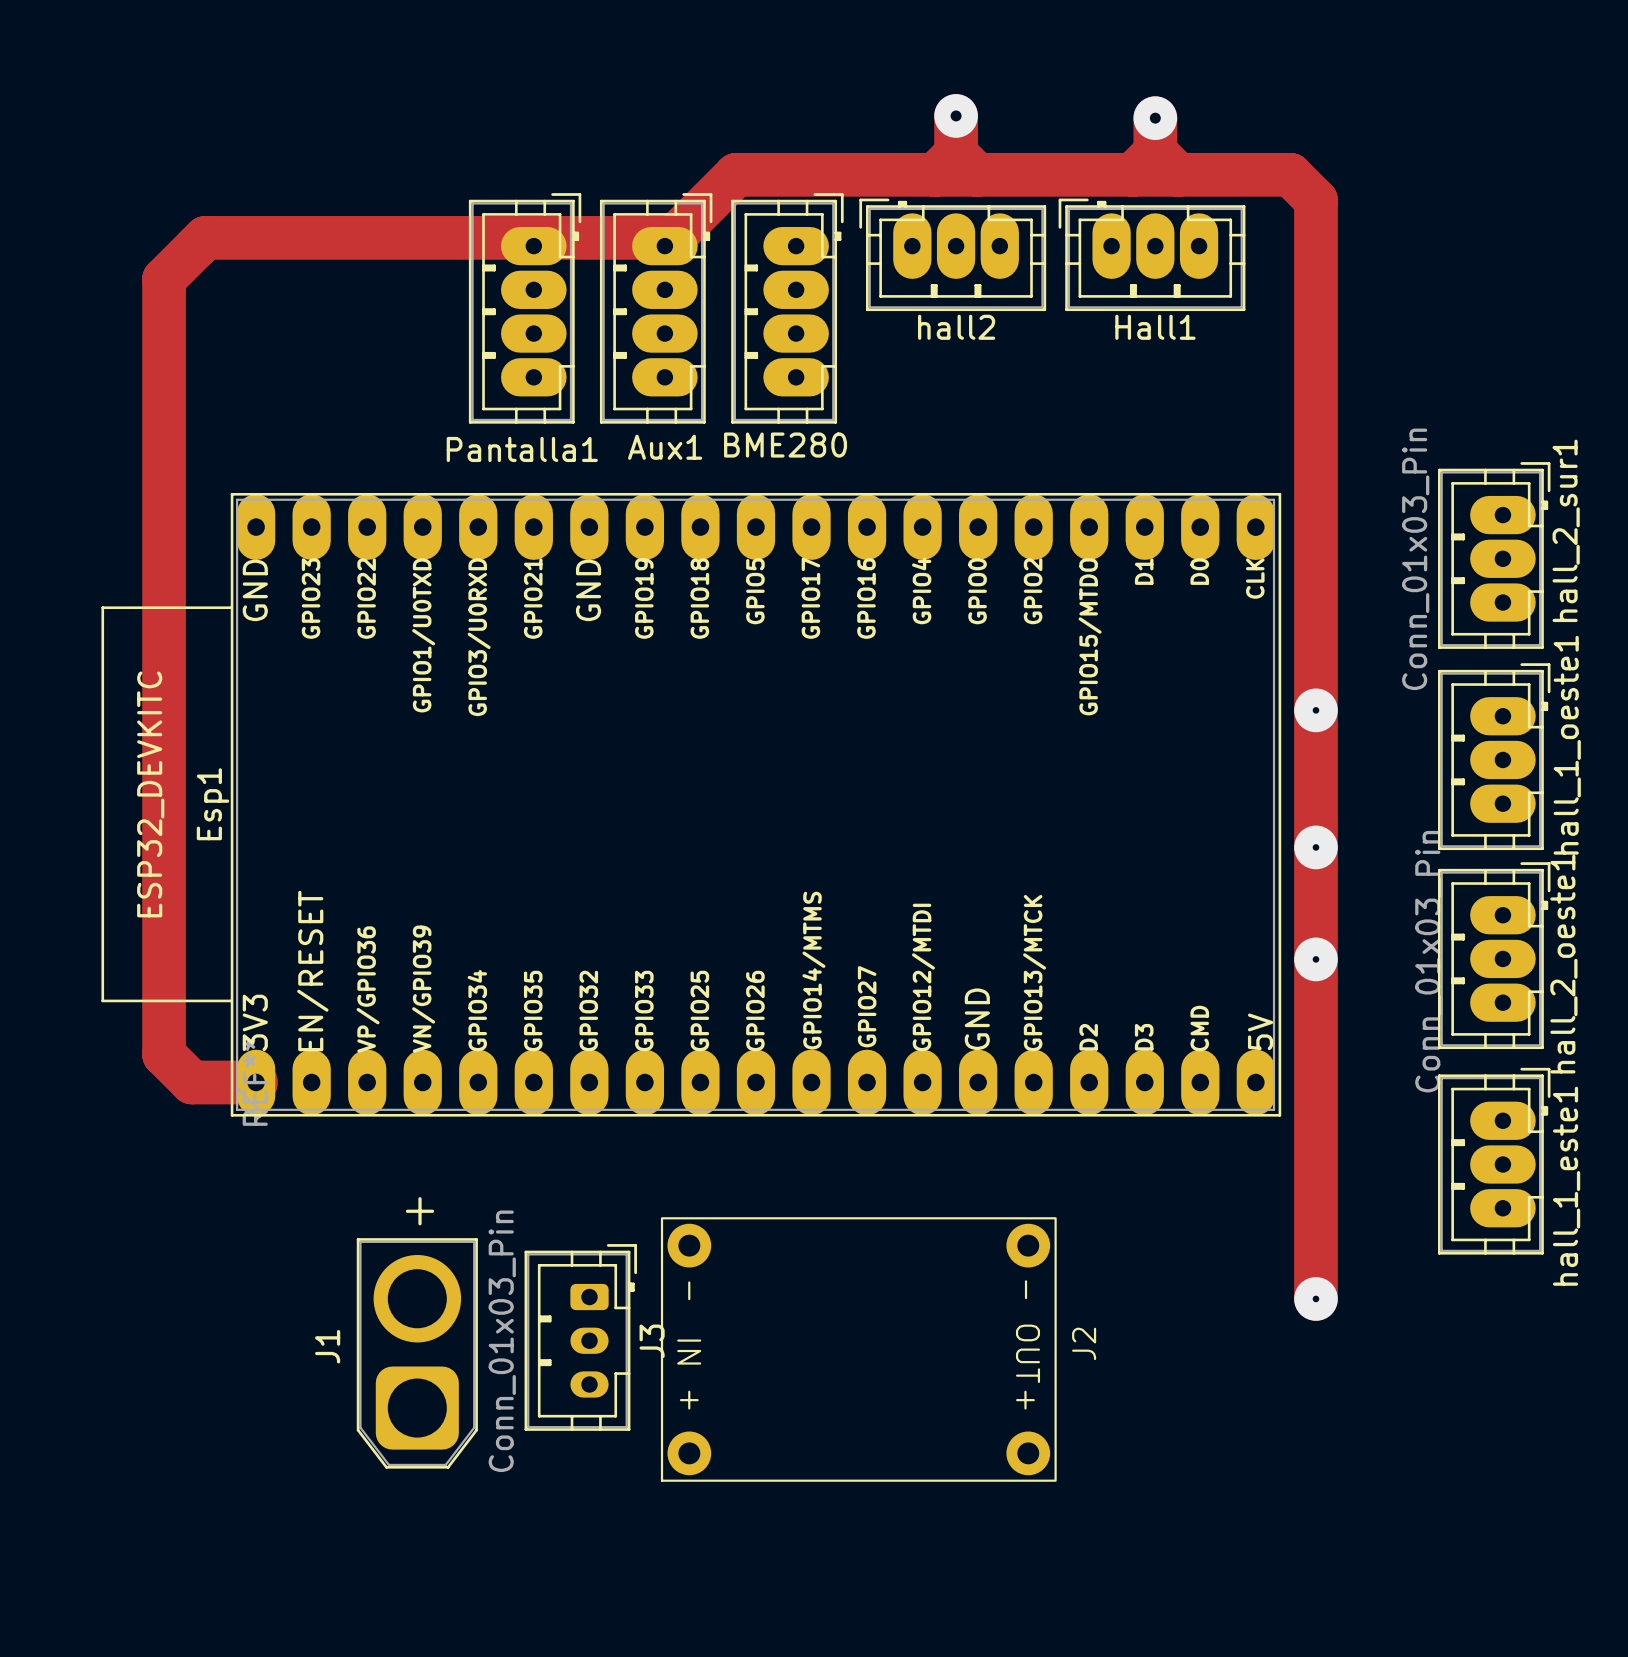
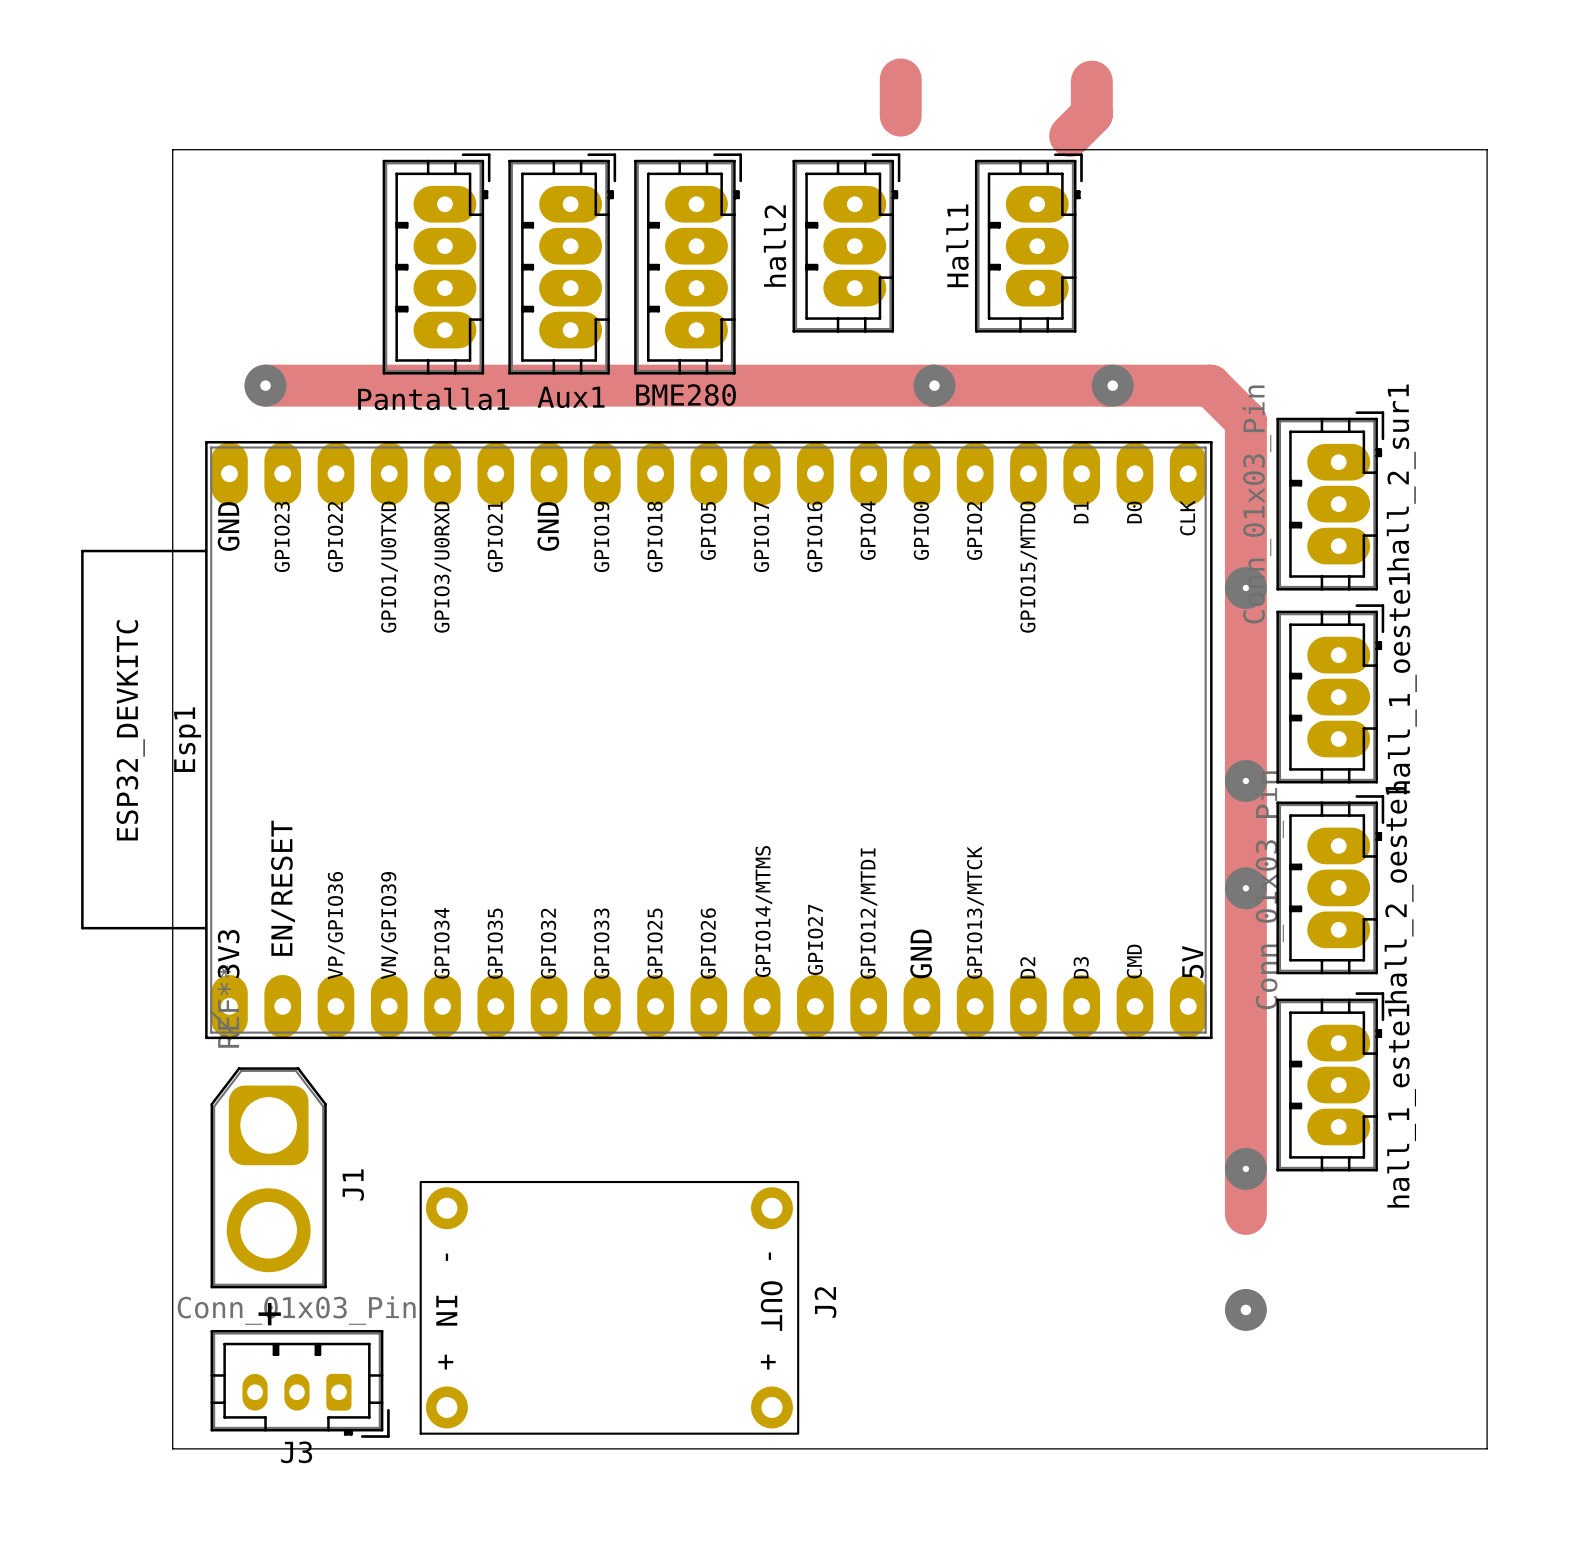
via: (956, 115) -> none
via: (1155, 118) -> none
board edge: none -> (172, 149) (1487, 149) (1487, 1448) (172, 1448) (172, 149)
track: (1315, 200) (1315, 472) -> (265, 385) (1210, 385) (1245, 421)
track: (1315, 200) (1290, 174) (736, 174) (673, 237) (205, 237) (164, 279) (164, 1054) (191, 1082) (256, 1082) -> none
hall2 rotation: 0° (952, 254) -> 90° clockwise (846, 243)
Hall1 rotation: 0° (1152, 254) -> 90° clockwise (1028, 243)
Pantalla1 position: (525, 308) -> (436, 264)
Aux1 position: (656, 308) -> (562, 264)
BME280 position: (787, 308) -> (688, 264)
via: none -> (265, 385)
via: none -> (934, 385)
via: none -> (1112, 385)
hall_2_sur1 position: (1494, 555) -> (1330, 500)
via position: (1315, 710) -> (1245, 588)
hall_1_oeste1 position: (1494, 756) -> (1330, 693)
hall_2_oeste1 position: (1494, 955) -> (1330, 884)
hall_1_este1 position: (1494, 1161) -> (1330, 1081)
via position: (1315, 1298) -> (1245, 1168)
J3 rotation: 0° (580, 1337) -> 90° clockwise (300, 1383)
J3 position: (580, 1337) -> (300, 1383)
J2 position: (858, 1349) -> (609, 1307)
J1 rotation: 0° (417, 1353) -> 180° (268, 1177)
J1 position: (417, 1353) -> (268, 1177)
via: none -> (1245, 1309)

